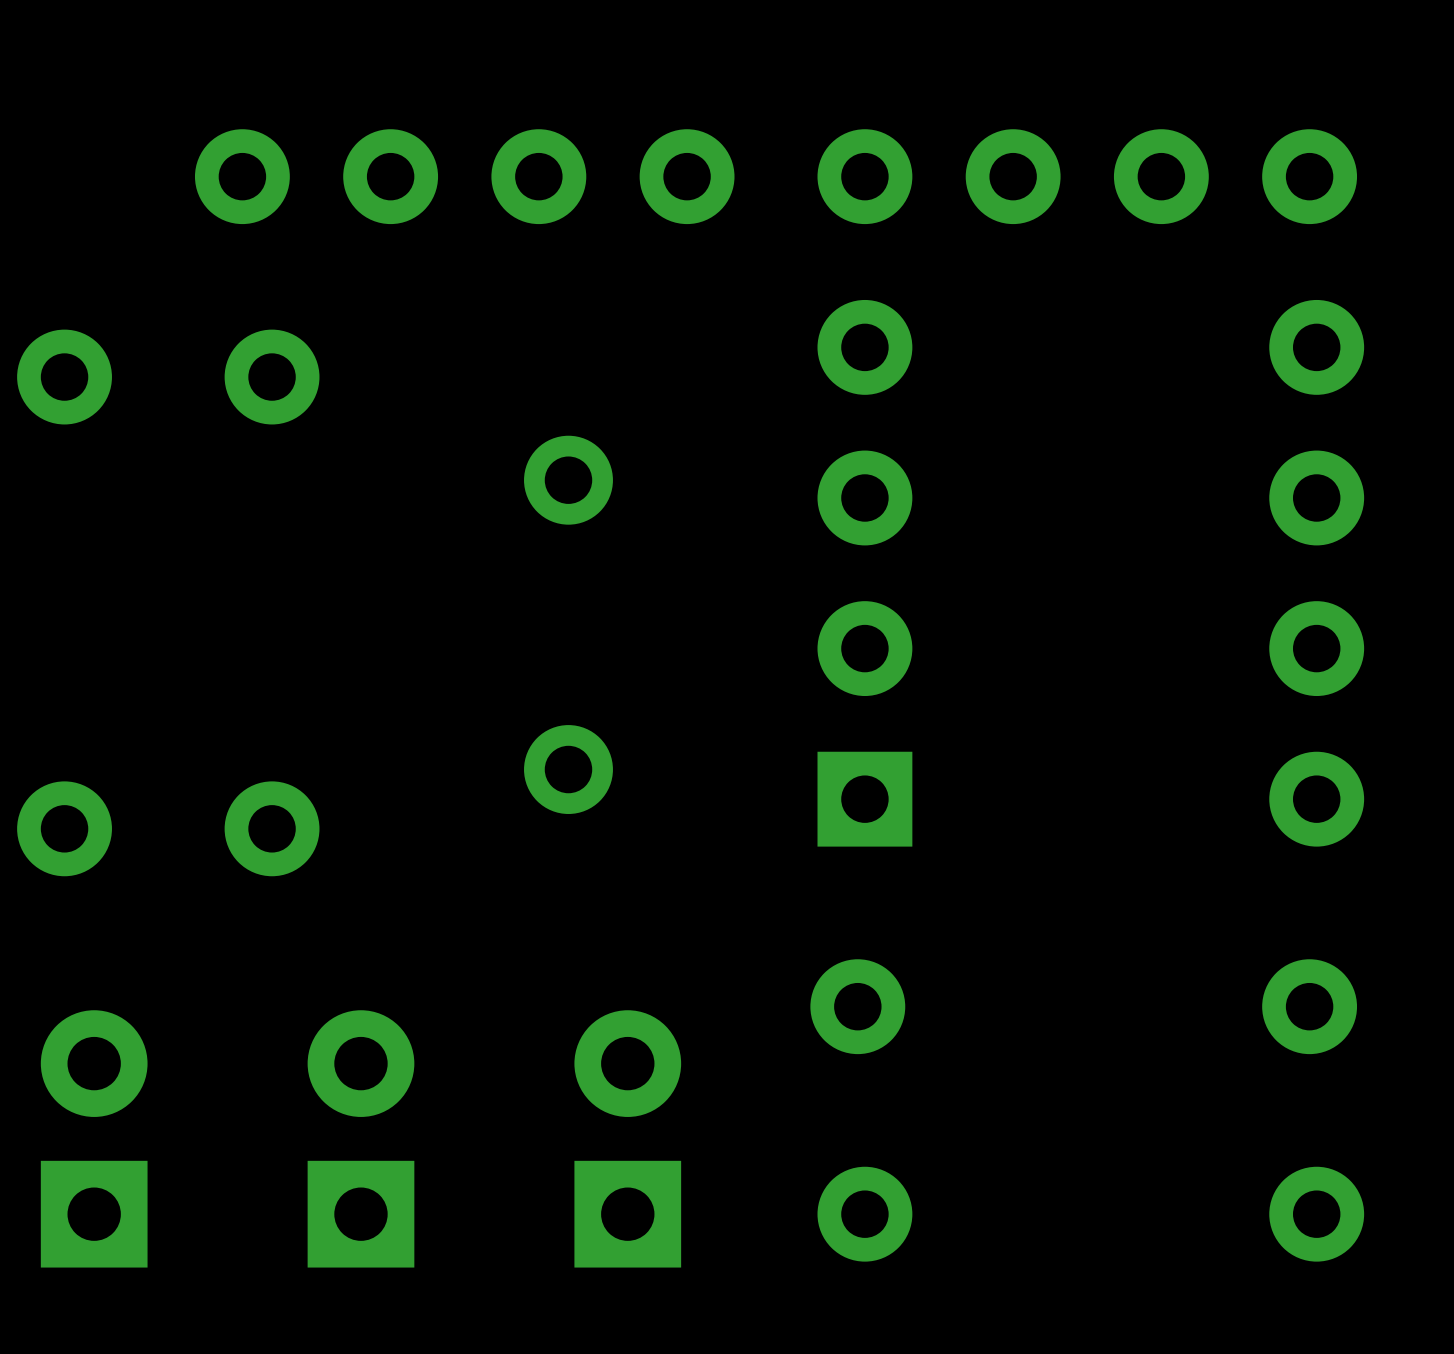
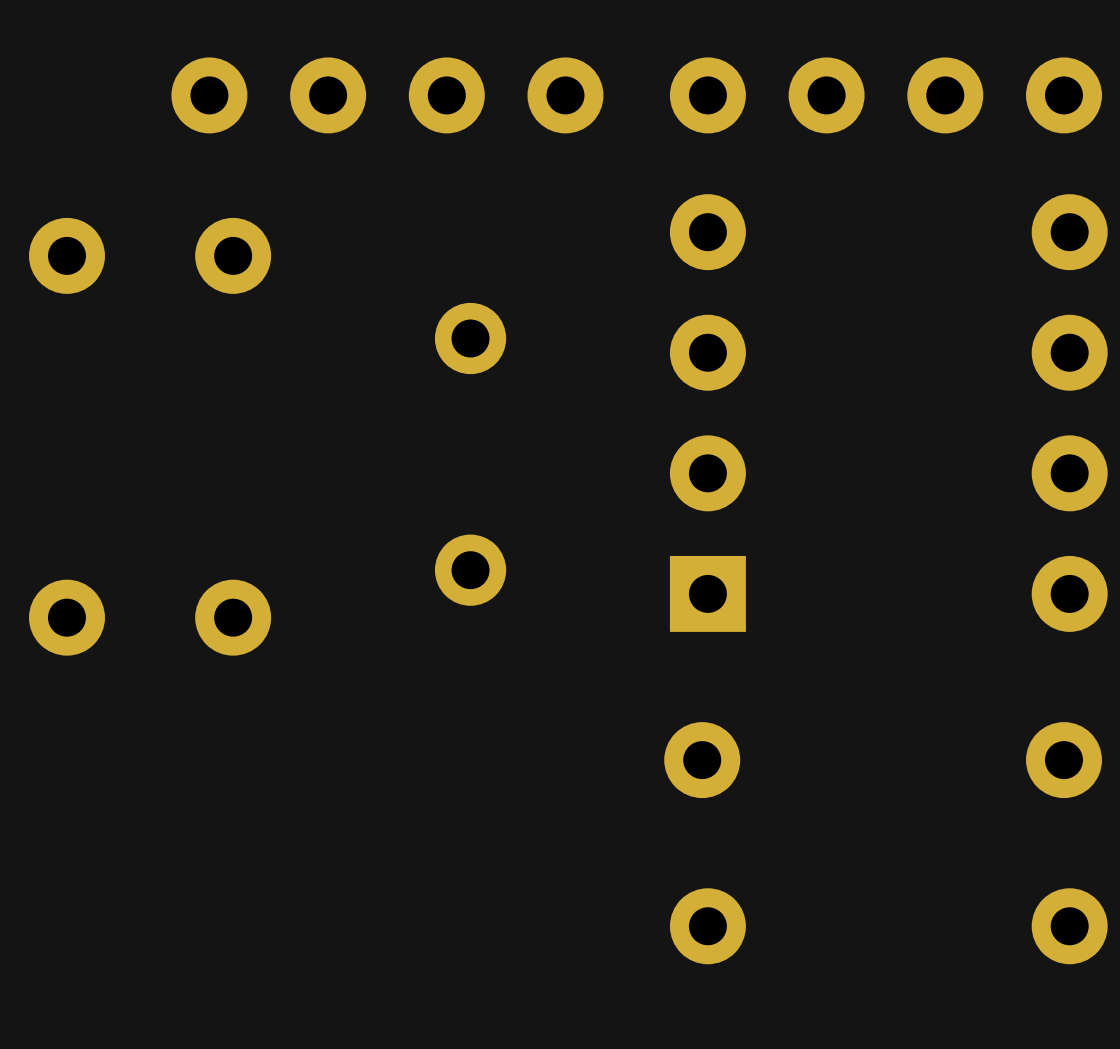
part: (94, 1138) -> none
part: (360, 1138) -> none
part: (627, 1138) -> none

